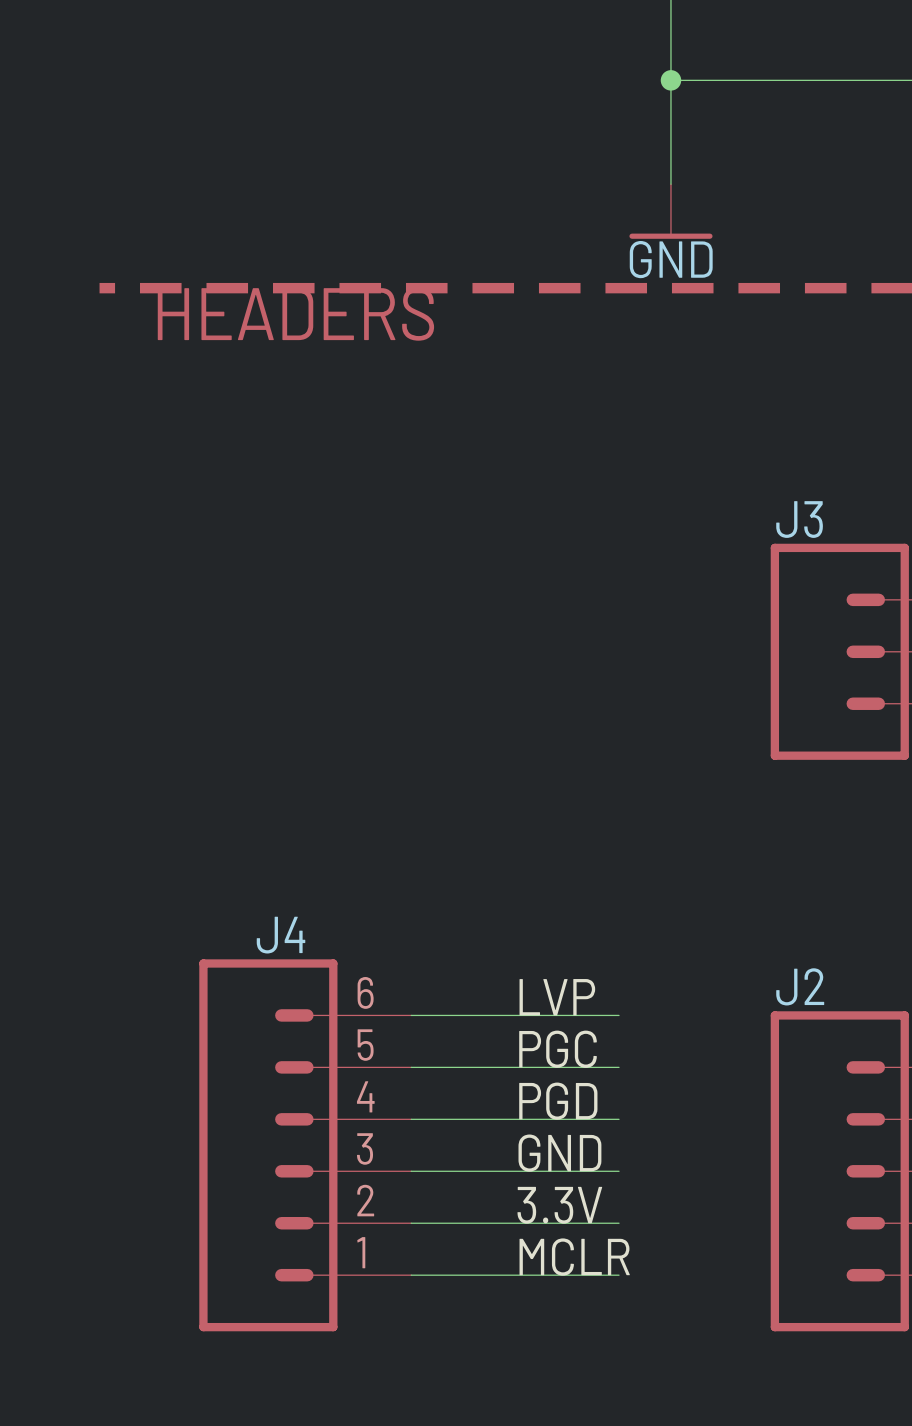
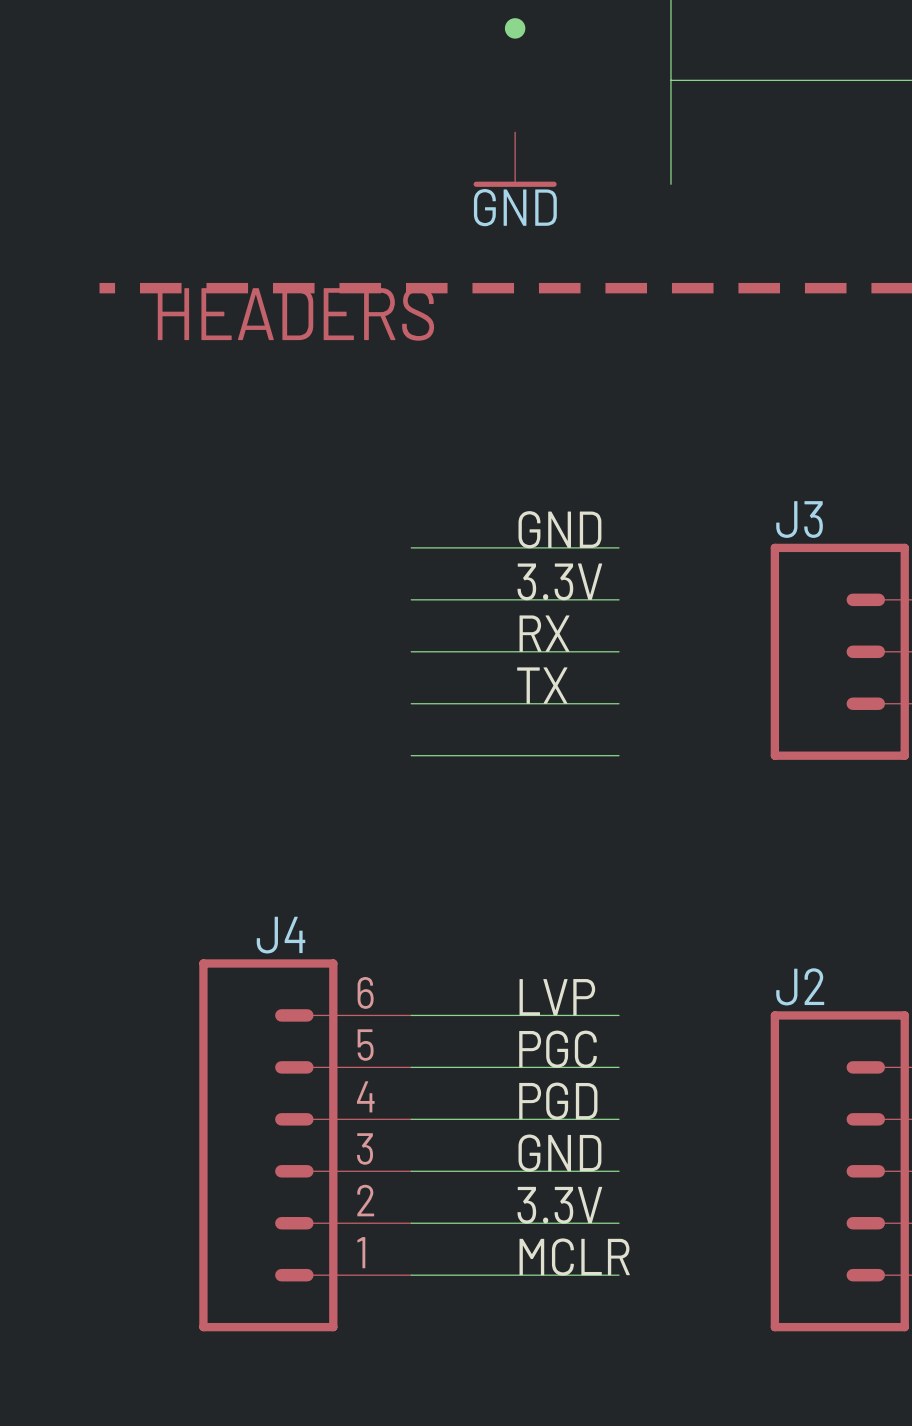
junction: none -> (515, 28)
junction: (670, 80) -> none
power symbol position: GND (670, 211) -> GND (515, 159)
label: none -> GND (559, 529)
wire: none -> (411, 547) (619, 547)
label: none -> 3.3V (559, 581)
wire: none -> (411, 599) (619, 599)
label: none -> RX (544, 633)
wire: none -> (411, 651) (619, 651)
label: none -> TX (542, 685)
wire: none -> (411, 703) (619, 703)
wire: none -> (411, 755) (619, 755)

